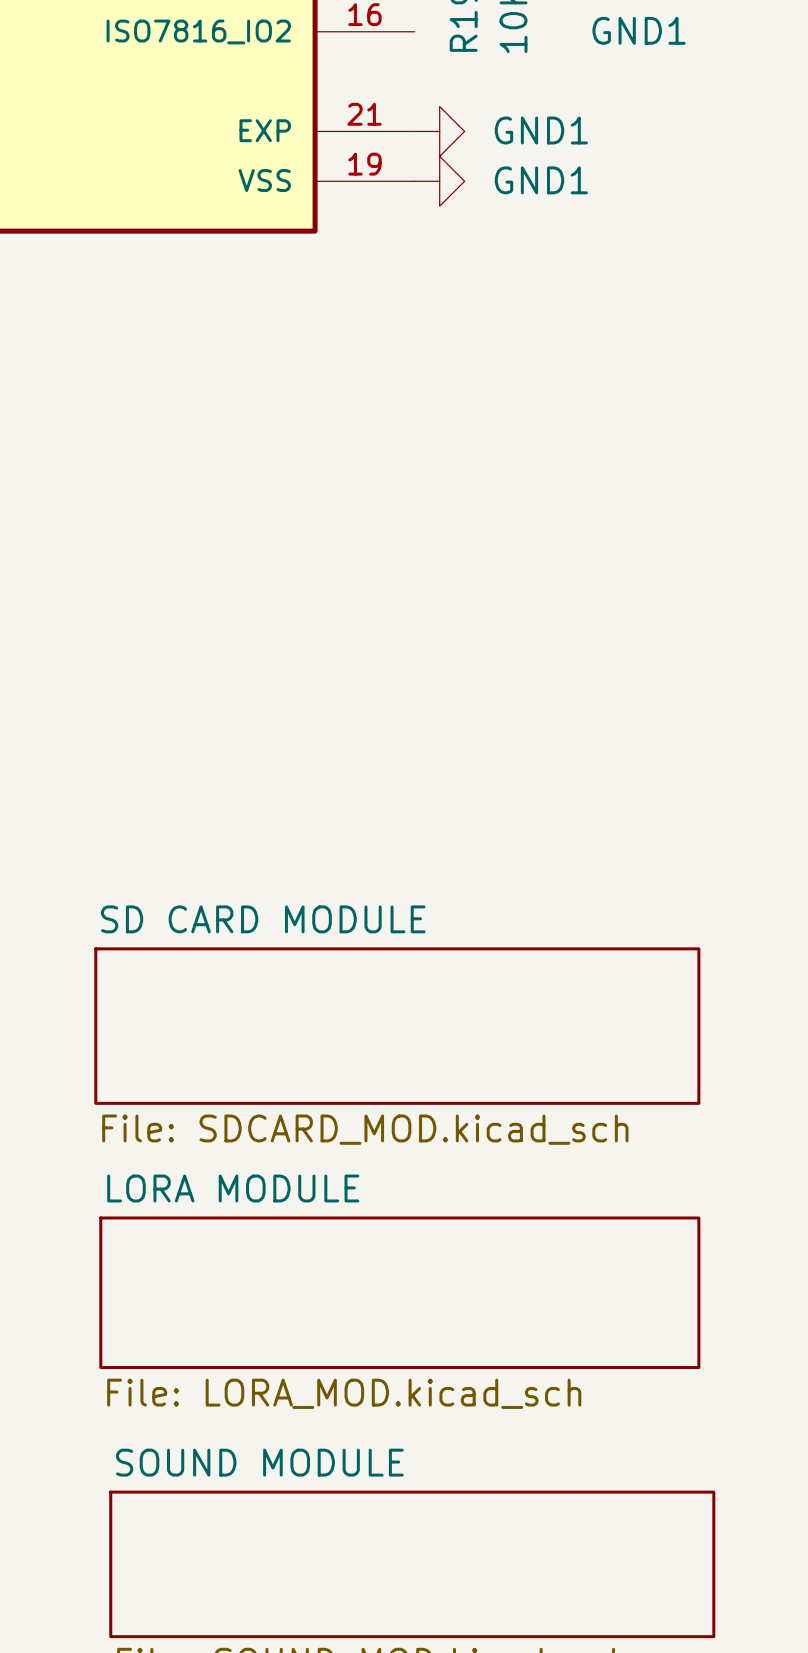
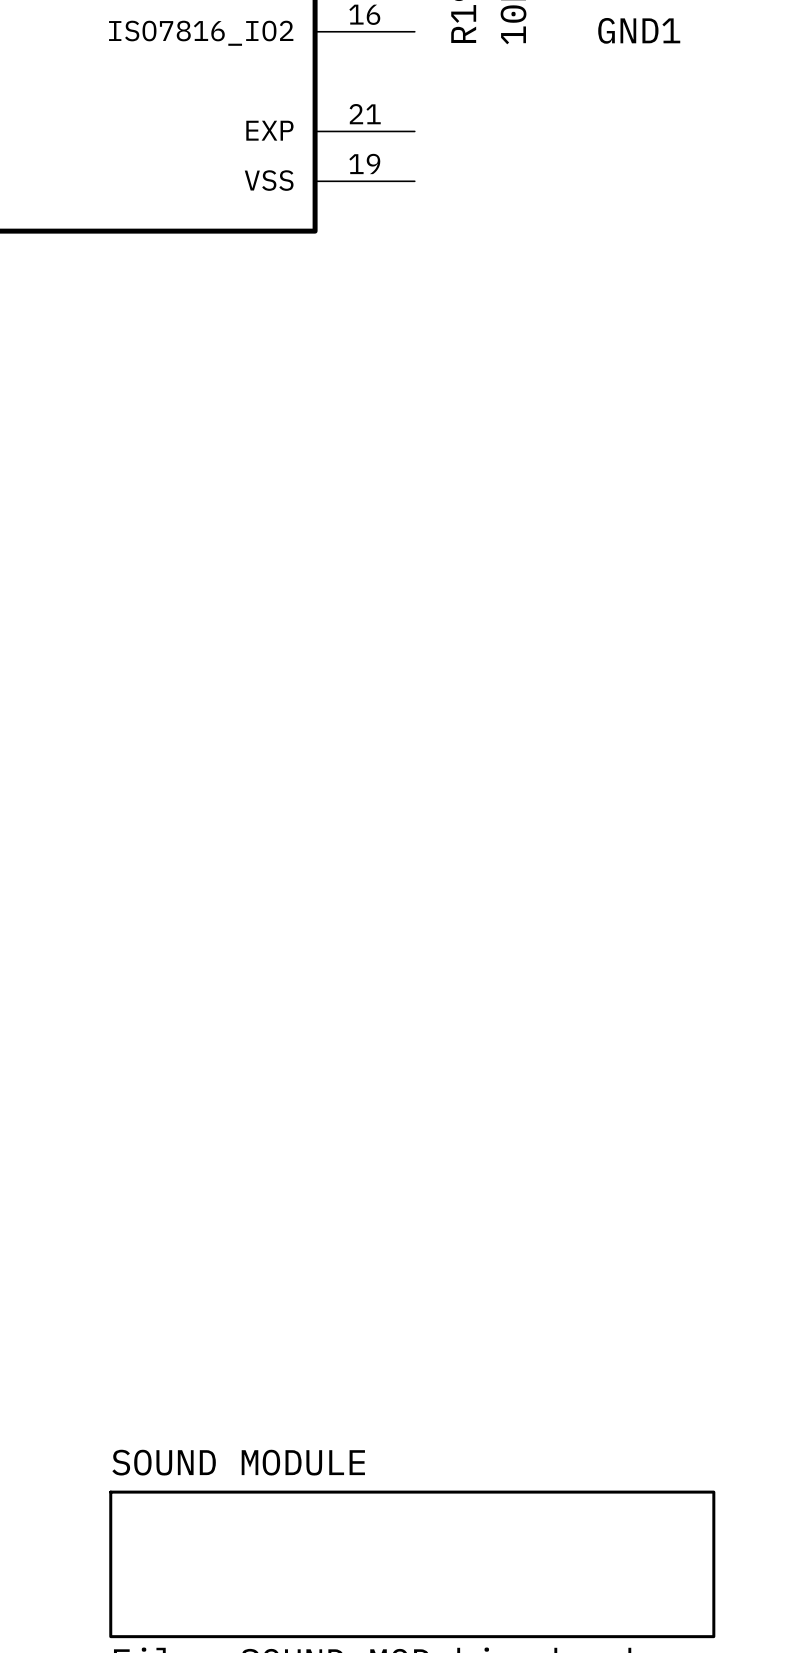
power symbol: GND1 (439, 131) -> none
power symbol: GND1 (439, 181) -> none
sheet SD CARD MODULE: File: SDCARD_MOD.kicad_sch (397, 1026) -> none
sheet LORA MODULE: File: LORA_MOD.kicad_sch (399, 1292) -> none

